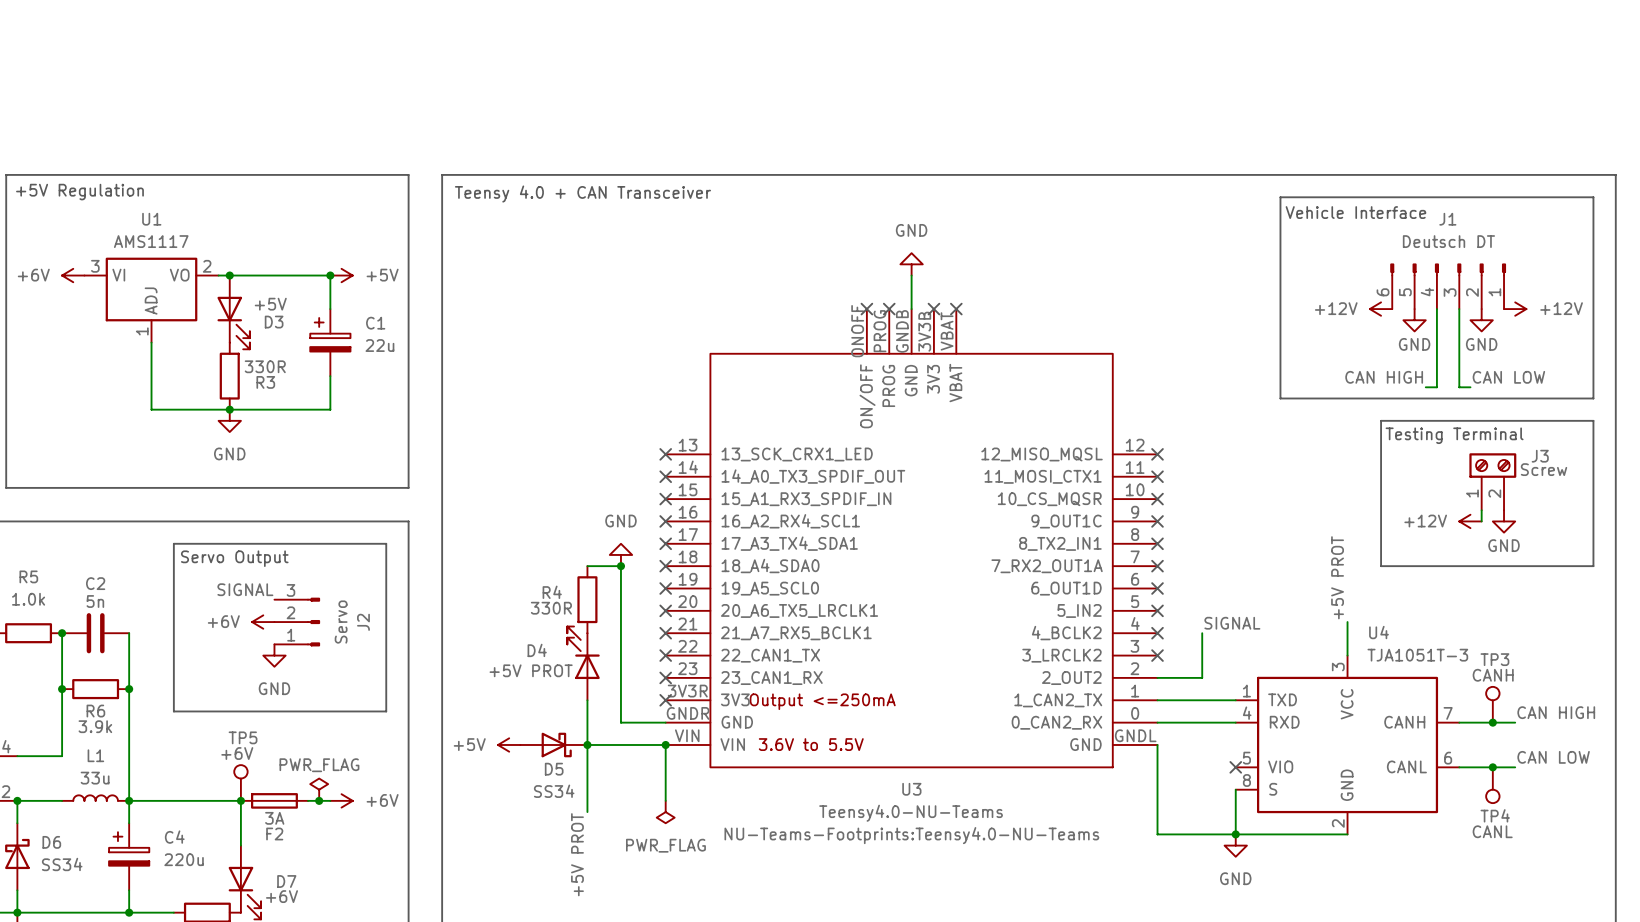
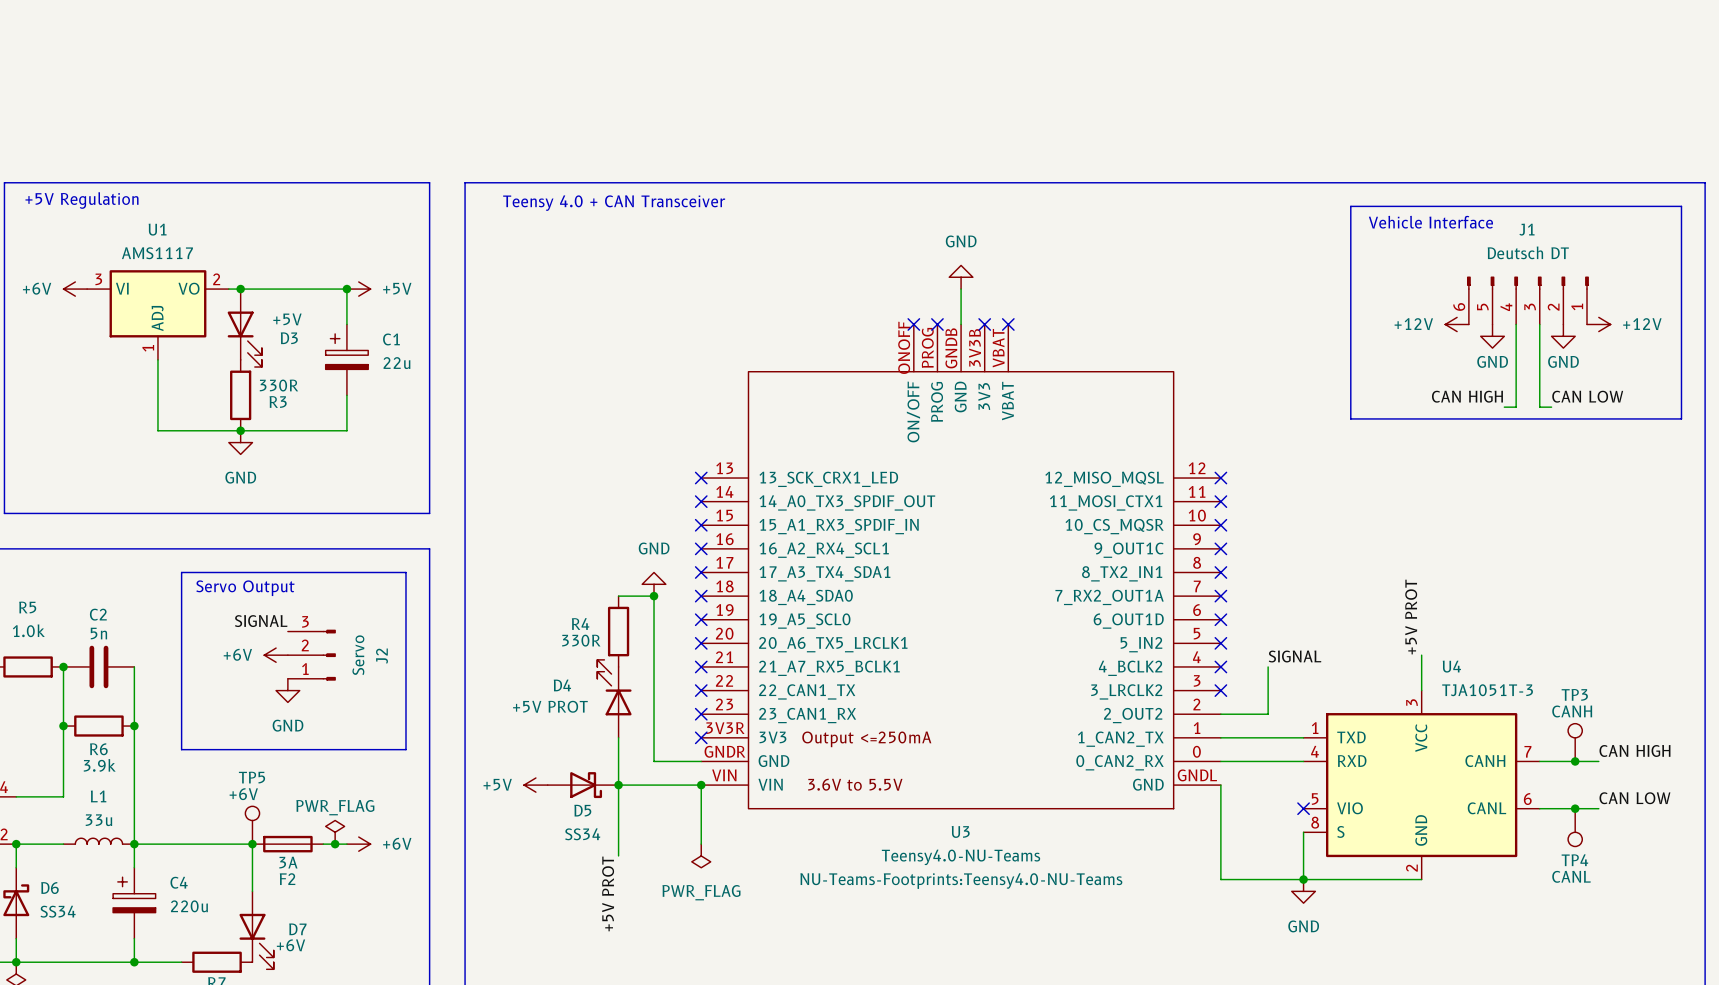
line: (1381, 420) (1593, 420) (1593, 566) (1381, 566) (1381, 420) -> none
text: Testing Terminal (1454, 435) -> none
J3: Screw (1492, 481) -> none
wire: (1481, 510) (1481, 521) -> none
power symbol: +12V (1470, 521) -> none
power symbol: GND (1504, 521) -> none

